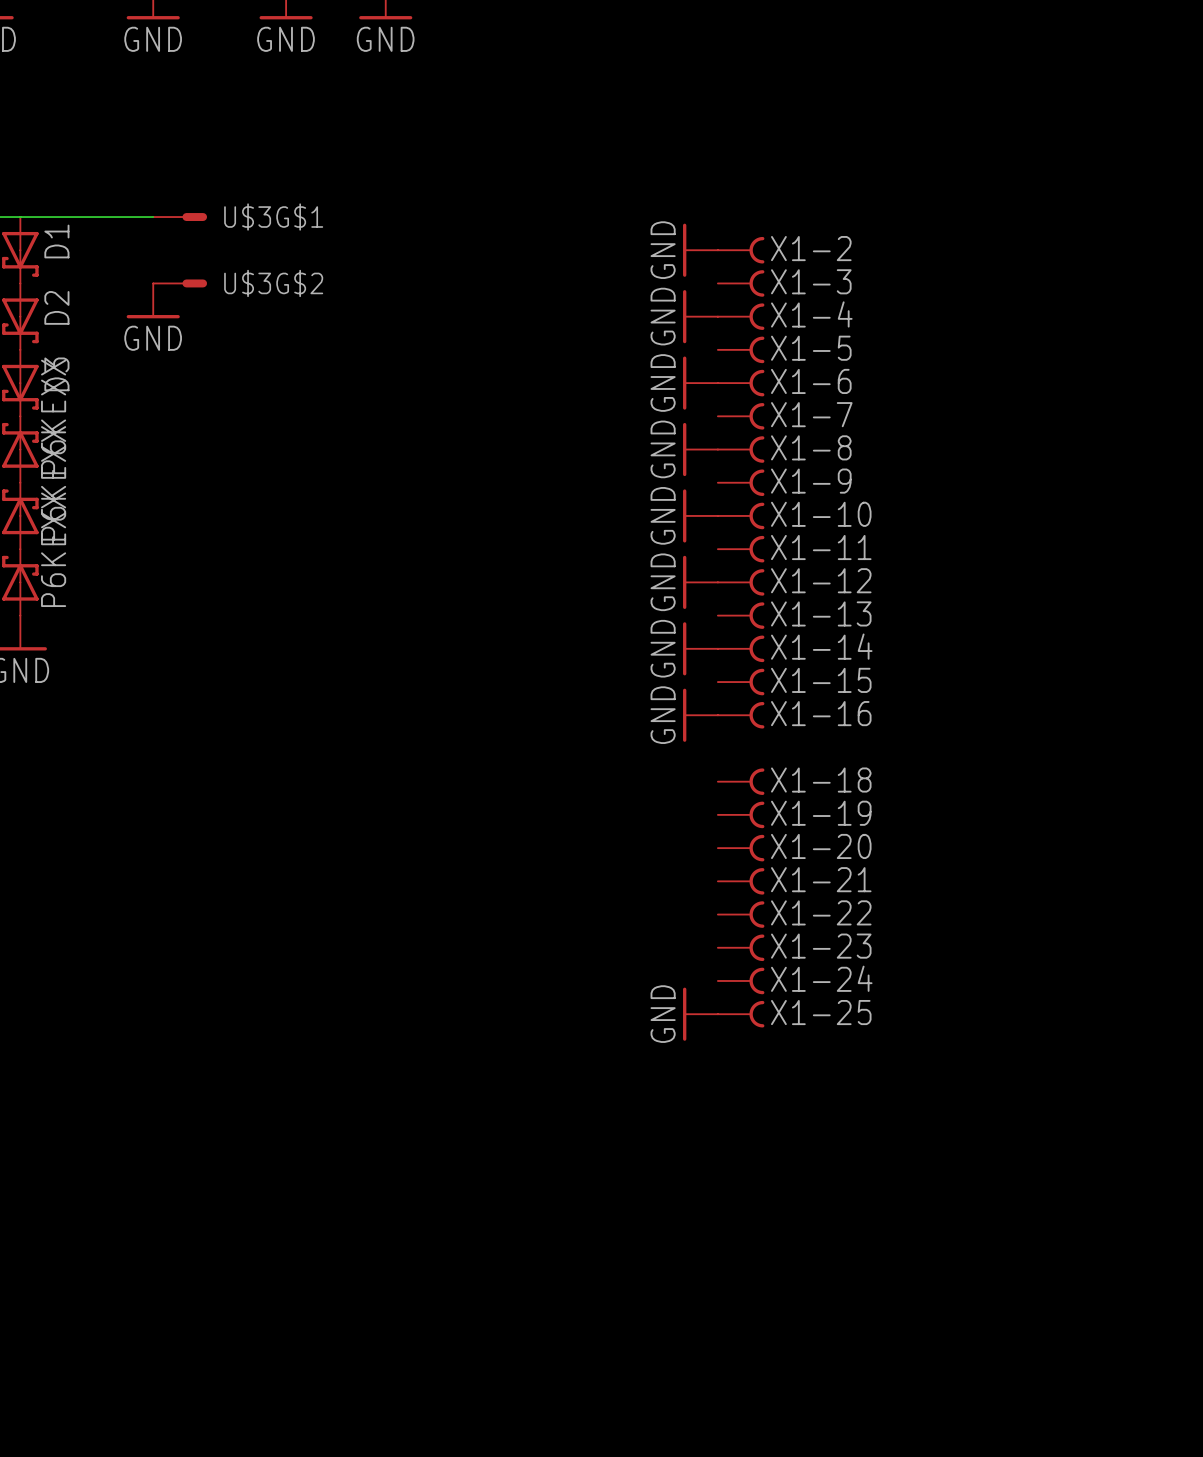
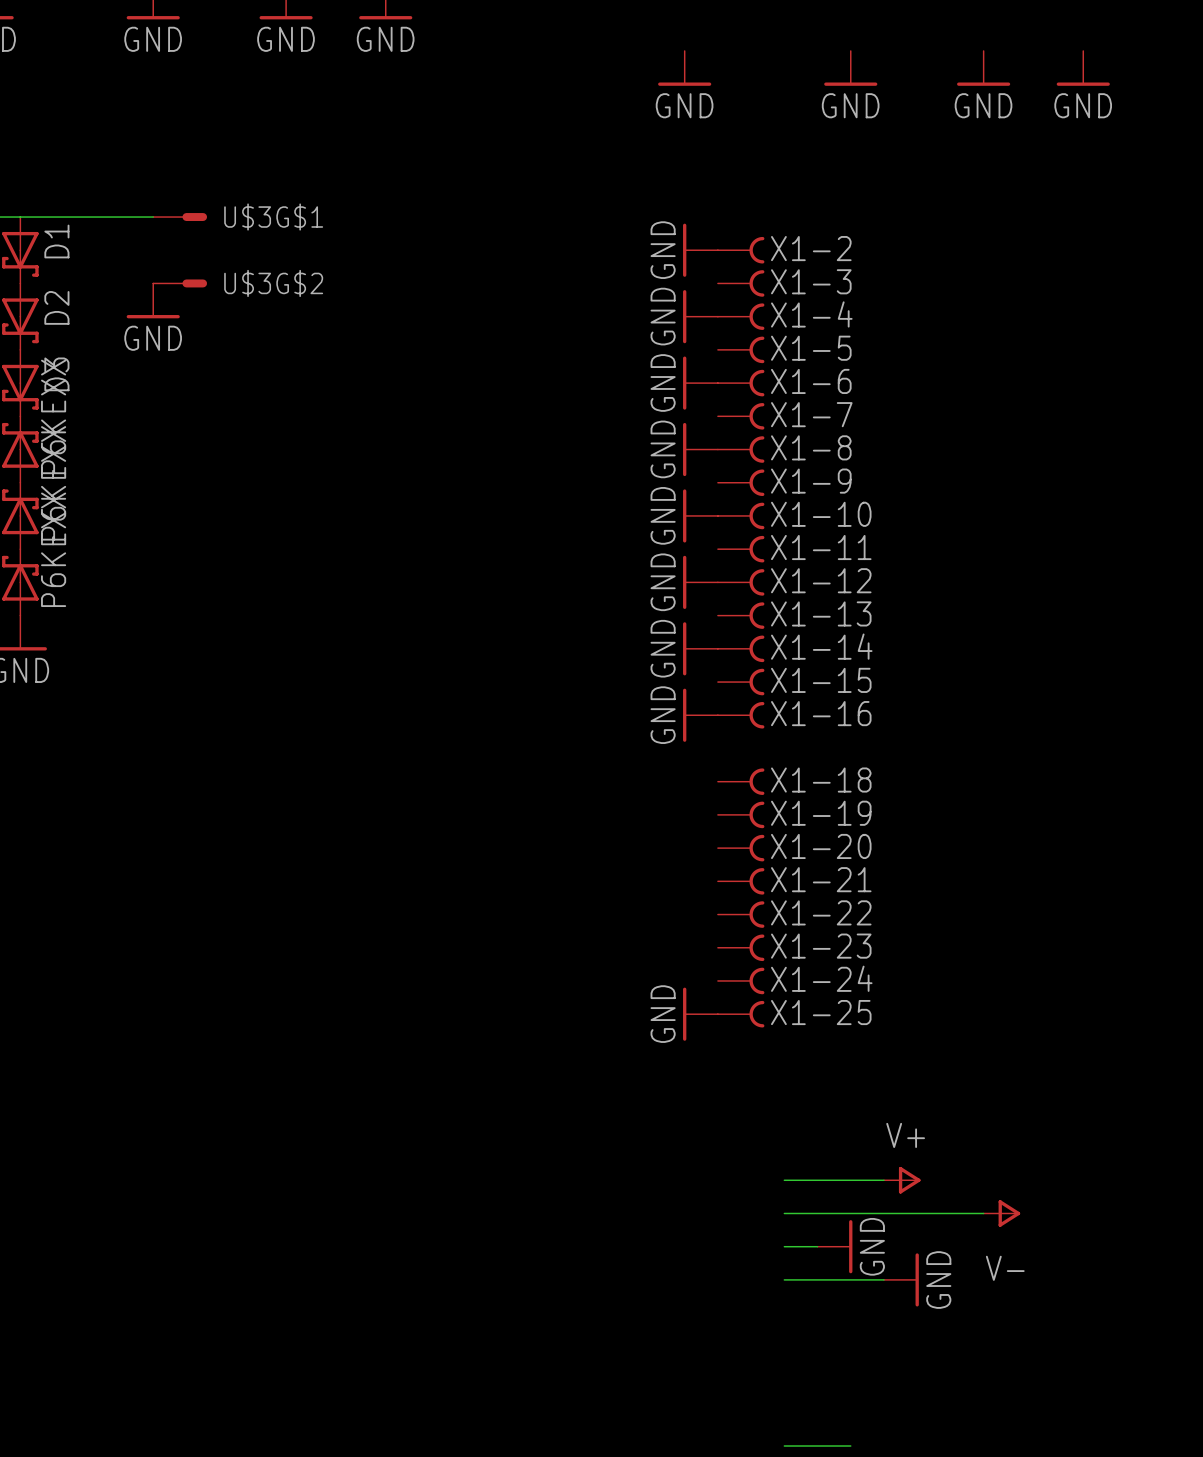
power symbol: none -> GND (684, 68)
power symbol: none -> GND (850, 68)
power symbol: none -> GND (983, 68)
power symbol: none -> GND (1083, 68)
wire: none -> (784, 1180) (883, 1180)
power symbol: none -> V+ (902, 1180)
wire: none -> (784, 1213) (983, 1213)
power symbol: none -> V- (1001, 1213)
wire: none -> (784, 1246) (817, 1246)
power symbol: none -> GND (834, 1246)
wire: none -> (784, 1279) (883, 1279)
power symbol: none -> GND (901, 1279)
wire: none -> (784, 1446) (850, 1446)

